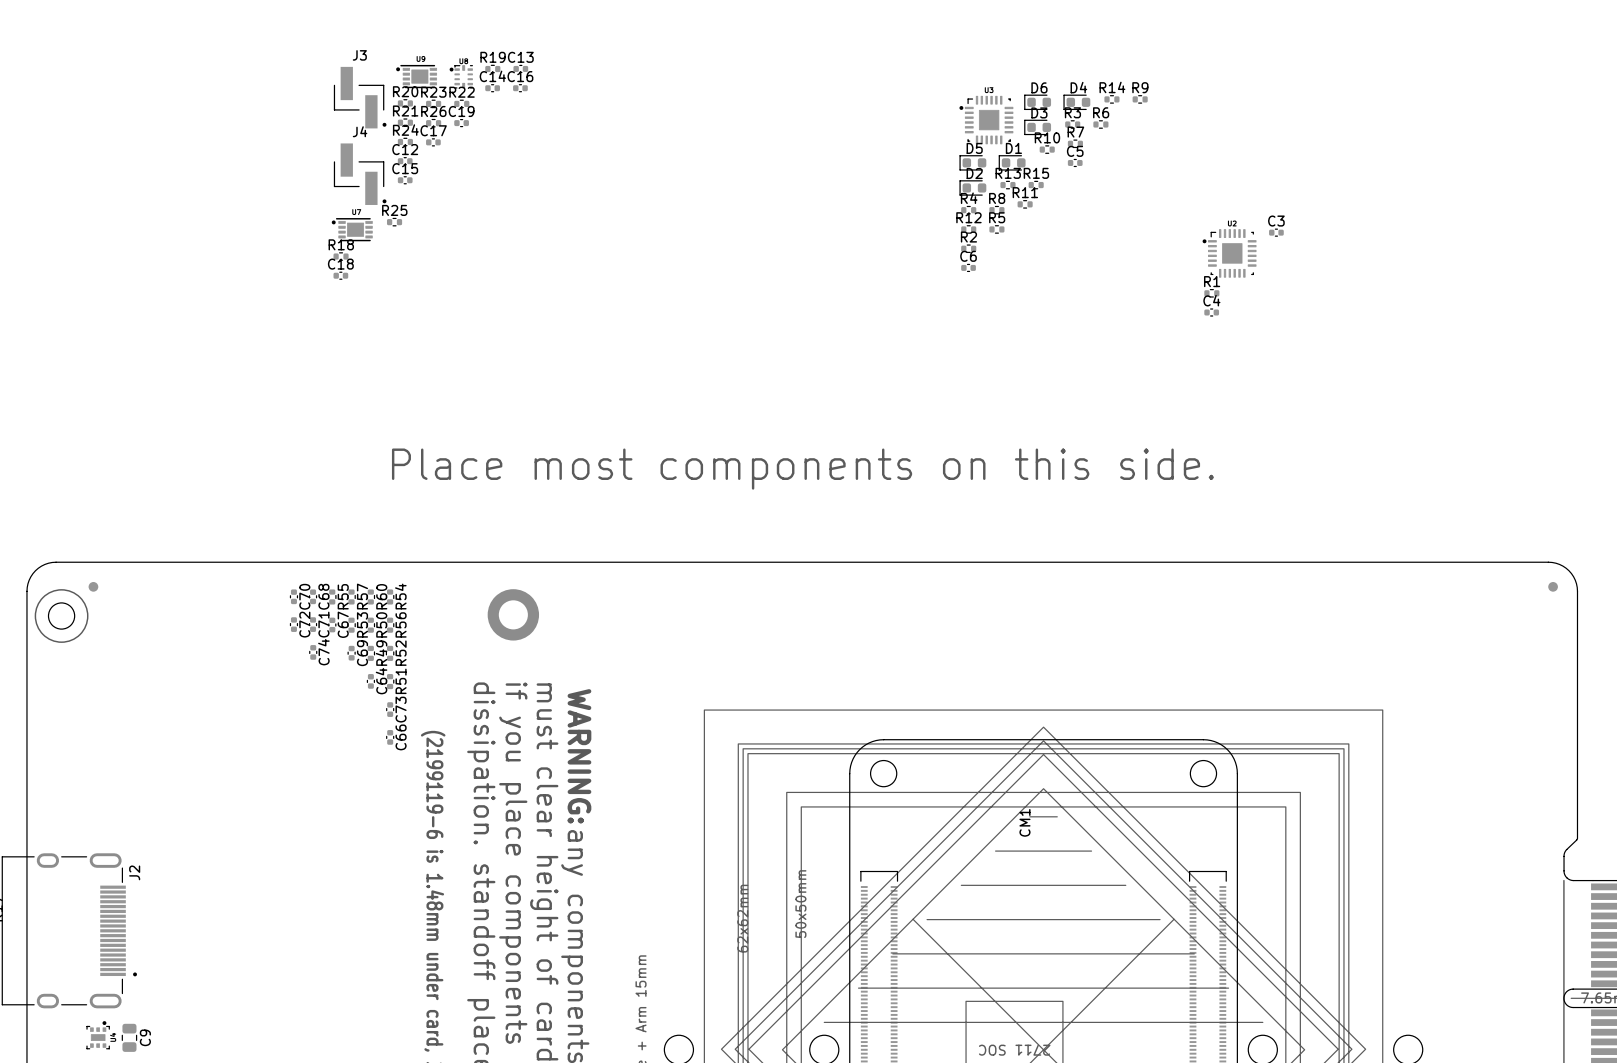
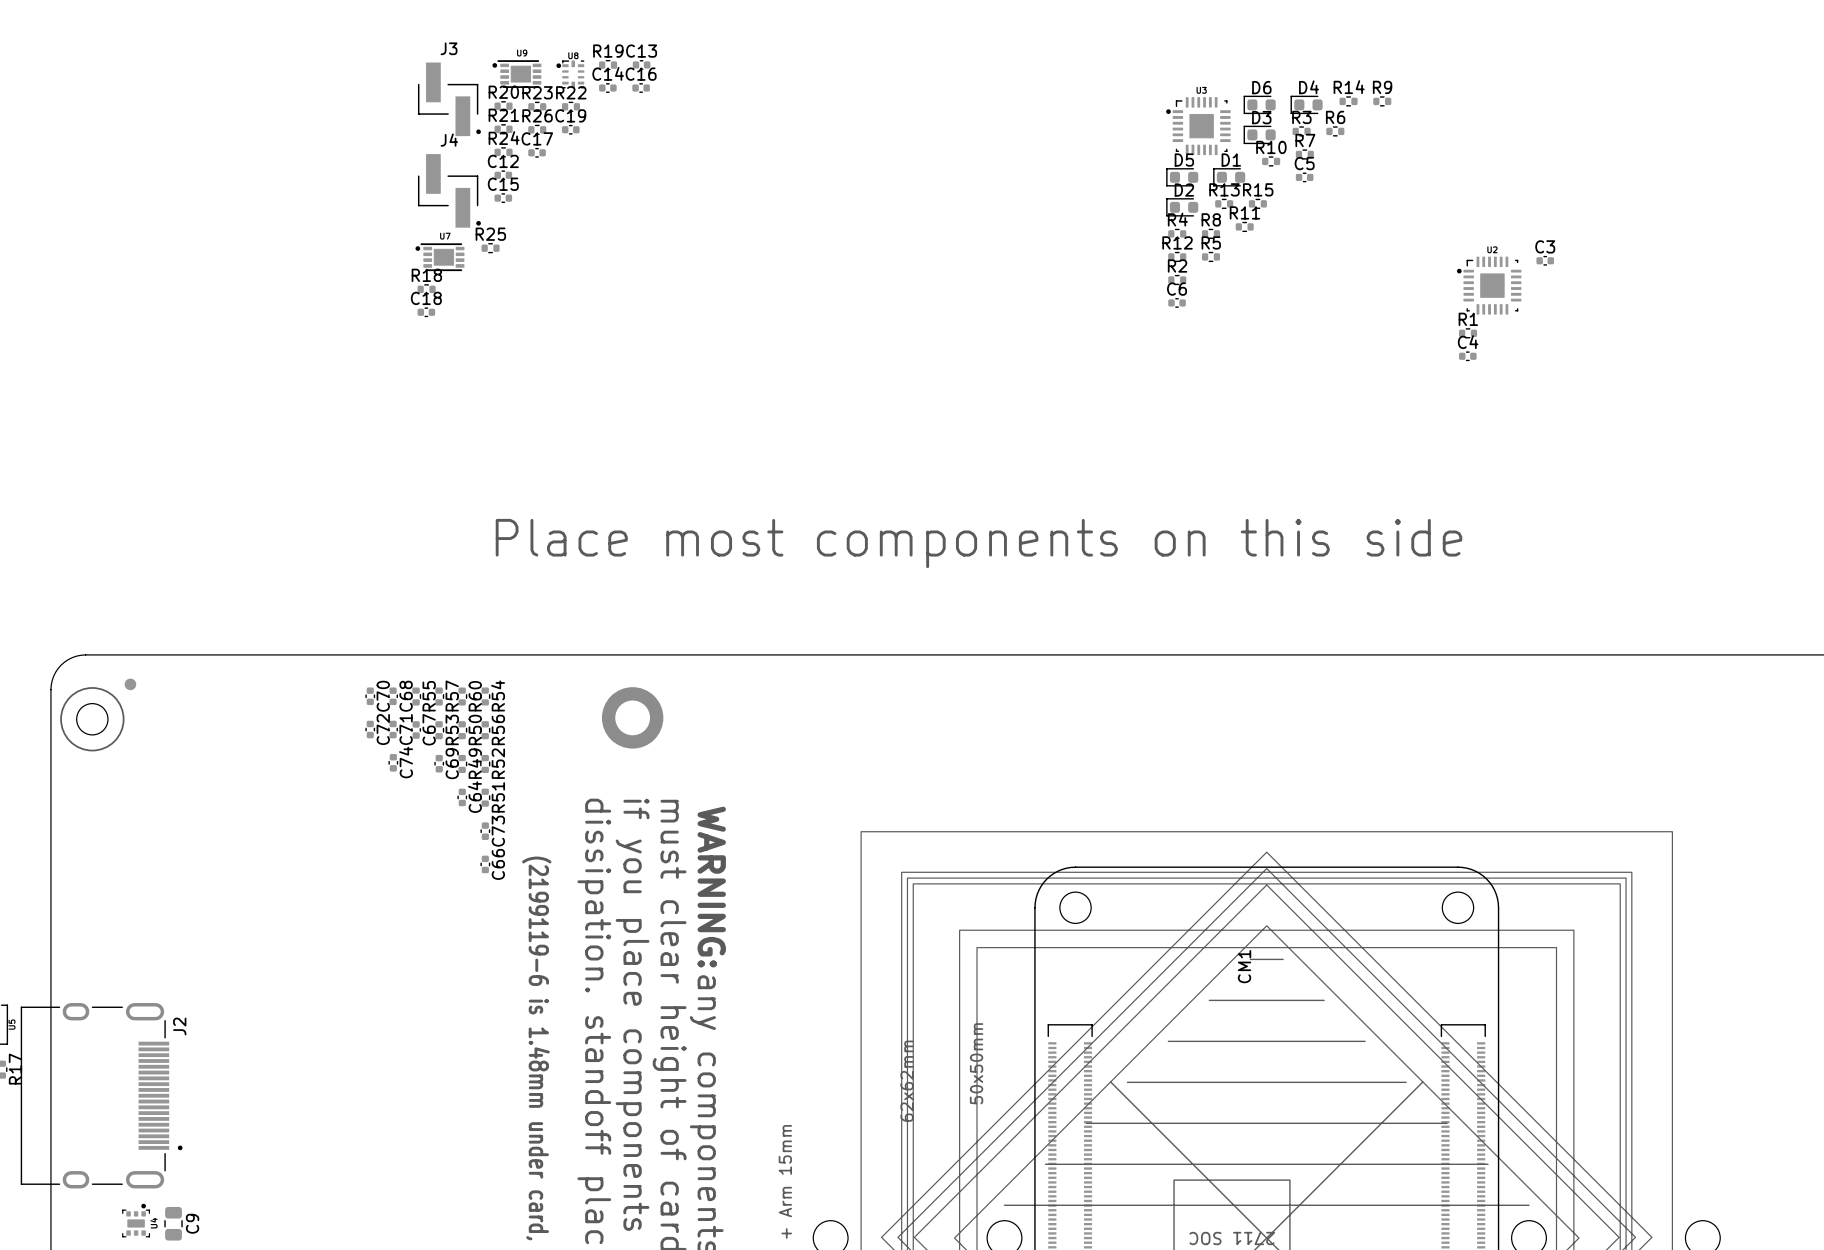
text: Place most components on this side. (802, 469) -> Place most components on this side (978, 543)

